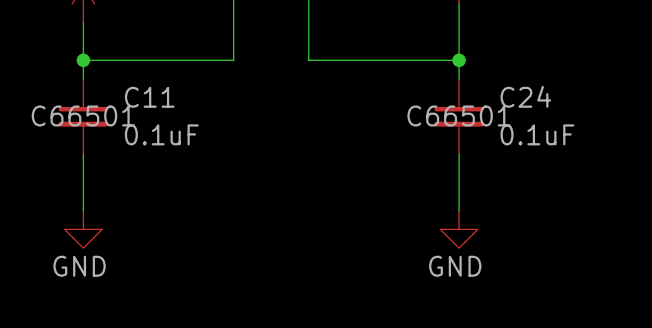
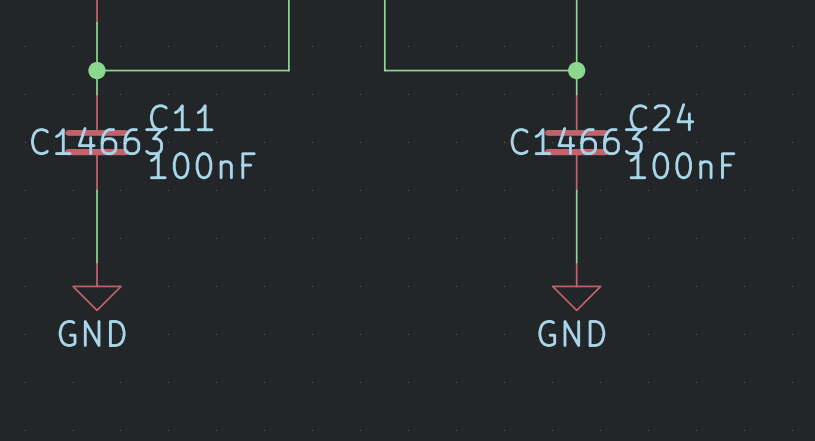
C11 text: C66501 (83, 115) -> C14663 (97, 141)
C24 text: C66501 (459, 115) -> C14663 (576, 141)
C11 value: 0.1uF (161, 134) -> 100nF (202, 165)
C24 value: 0.1uF (537, 134) -> 100nF (682, 165)

